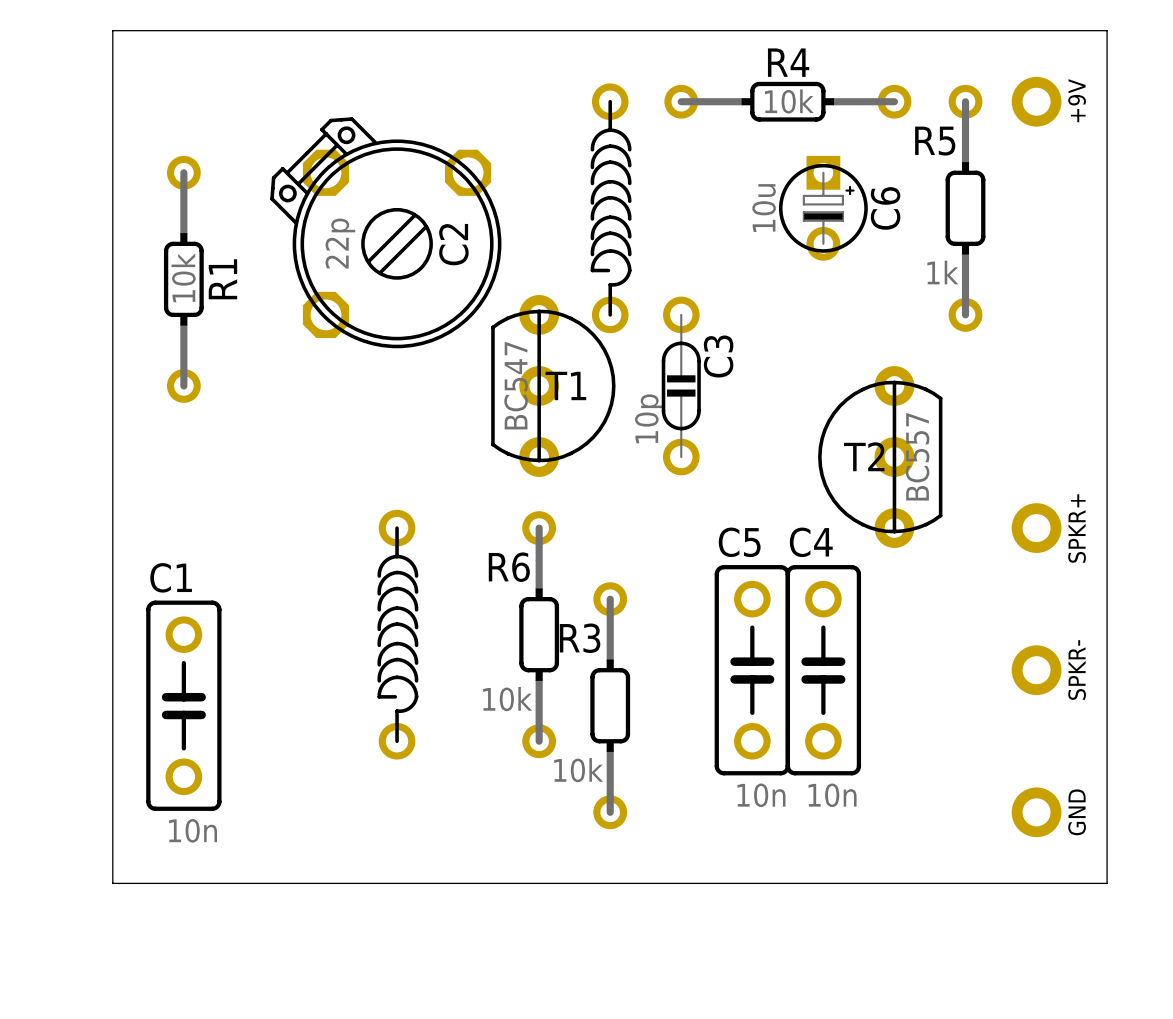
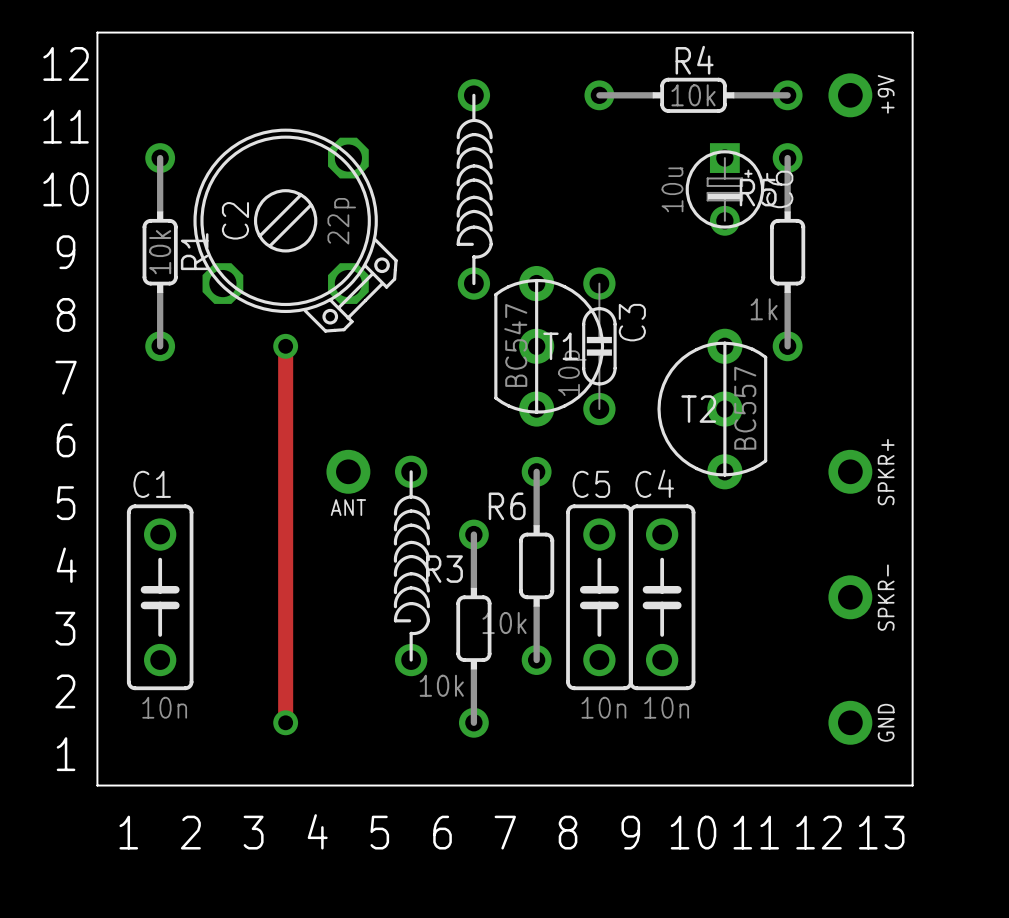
board edge: (1036, 30) (1107, 30) (1107, 883) (1036, 883) -> (912, 32) (912, 785)
text: none -> 12 (66, 63)
+9V position: (1036, 101) -> (850, 95)
text: none -> 11 (66, 126)
text: none -> 10 (66, 189)
part position: (611, 208) -> (474, 189)
R5 position: (965, 208) -> (787, 252)
C2 rotation: 0° (385, 232) -> 180° (295, 230)
text: none -> 9 (66, 252)
text: none -> 8 (66, 314)
track: none -> (285, 346) (285, 722)
via: none -> (285, 346)
T1 position: (553, 385) -> (549, 346)
text: none -> 7 (66, 377)
T2 position: (880, 457) -> (712, 409)
text: none -> 6 (66, 440)
ANT: none -> (348, 471)
SPKR+ position: (1036, 528) -> (850, 471)
C5 name: C5 (739, 542) -> C4 (654, 483)
text: none -> 5 (66, 503)
text: none -> 4 (66, 565)
part position: (397, 634) -> (411, 565)
R6 position: (539, 634) -> (536, 565)
C5: none -> 10n (599, 597)
C4: 10n (823, 670) -> none
SPKR- position: (1036, 670) -> (850, 597)
text: none -> 3 (65, 628)
C1 position: (183, 705) -> (160, 597)
R3 position: (610, 705) -> (473, 628)
text: none -> 2 (65, 691)
via: none -> (285, 722)
GND position: (1036, 812) -> (850, 722)
text: none -> 1 (66, 754)
text: none -> 1 (128, 832)
text: none -> 2 (190, 832)
text: none -> 3 (253, 832)
text: none -> 4 (317, 831)
text: none -> 6 (442, 832)
text: none -> 7 (505, 832)
text: none -> 8 (568, 832)
text: none -> 9 (630, 832)
text: none -> 10 (693, 832)
text: none -> 11 (756, 832)
text: none -> 12 (819, 832)
text: none -> 13 (881, 832)
text: none -> 5 (379, 832)

